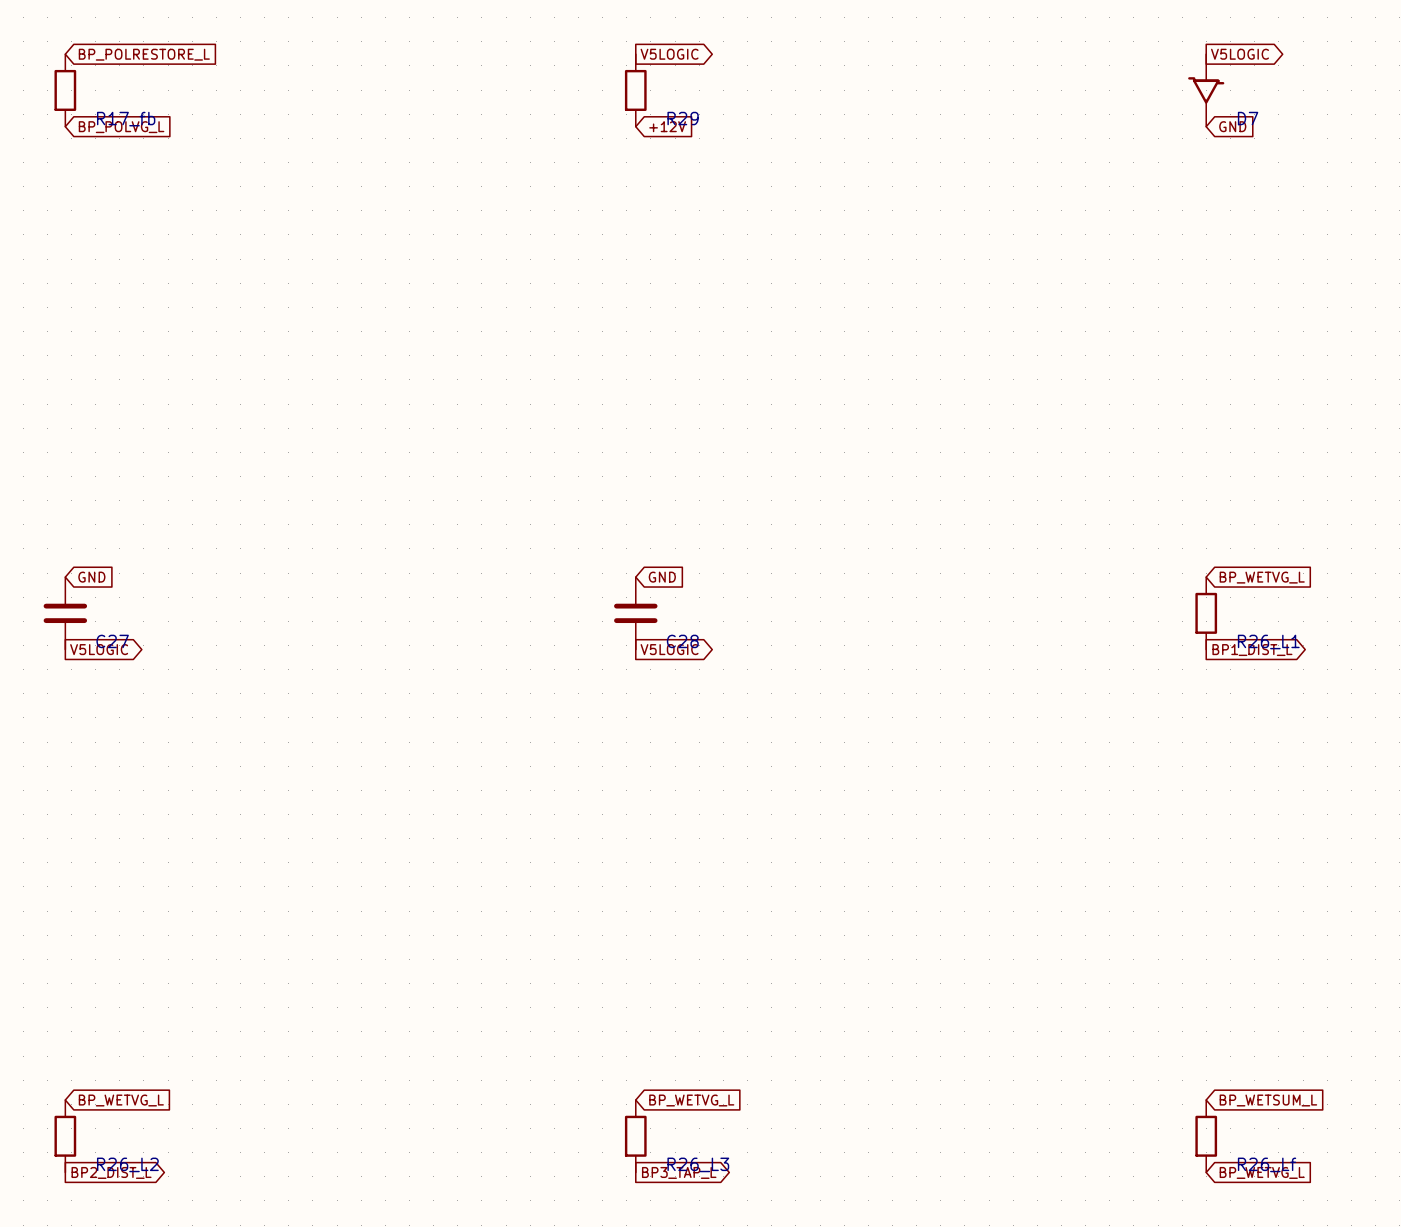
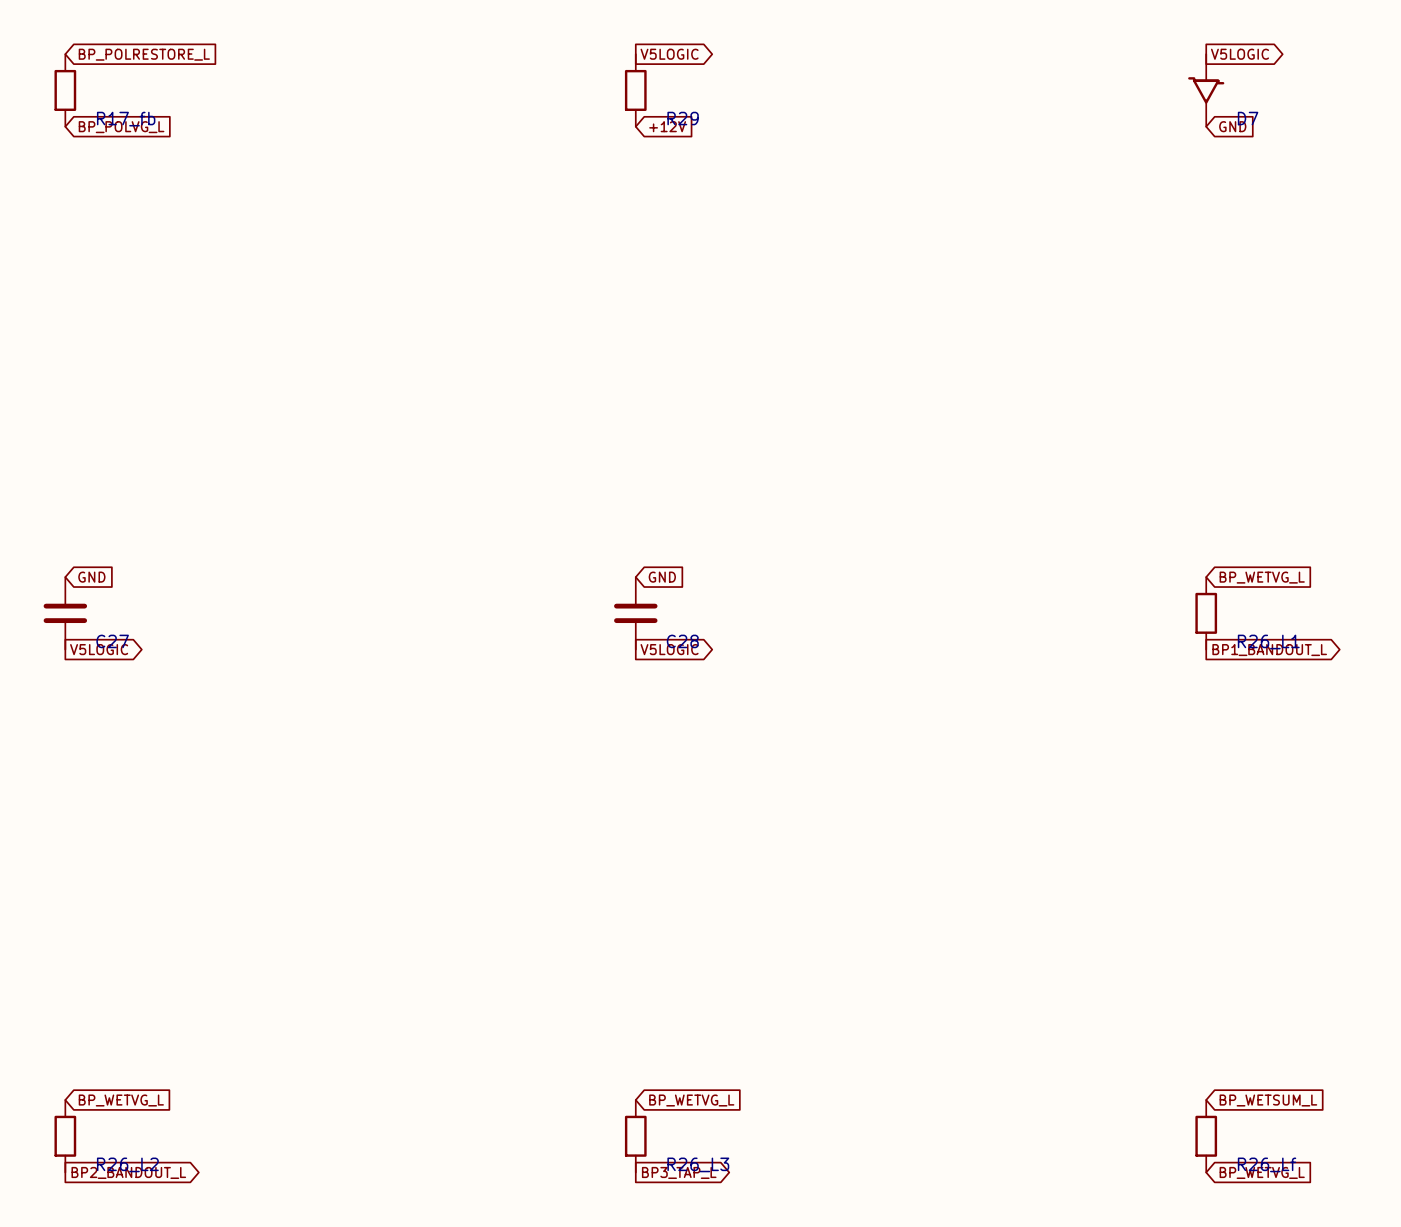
global label: BP1_DIST_L (1252, 650) -> BP1_BANDOUT_L (1269, 650)
global label: BP2_DIST_L (111, 1172) -> BP2_BANDOUT_L (128, 1172)

